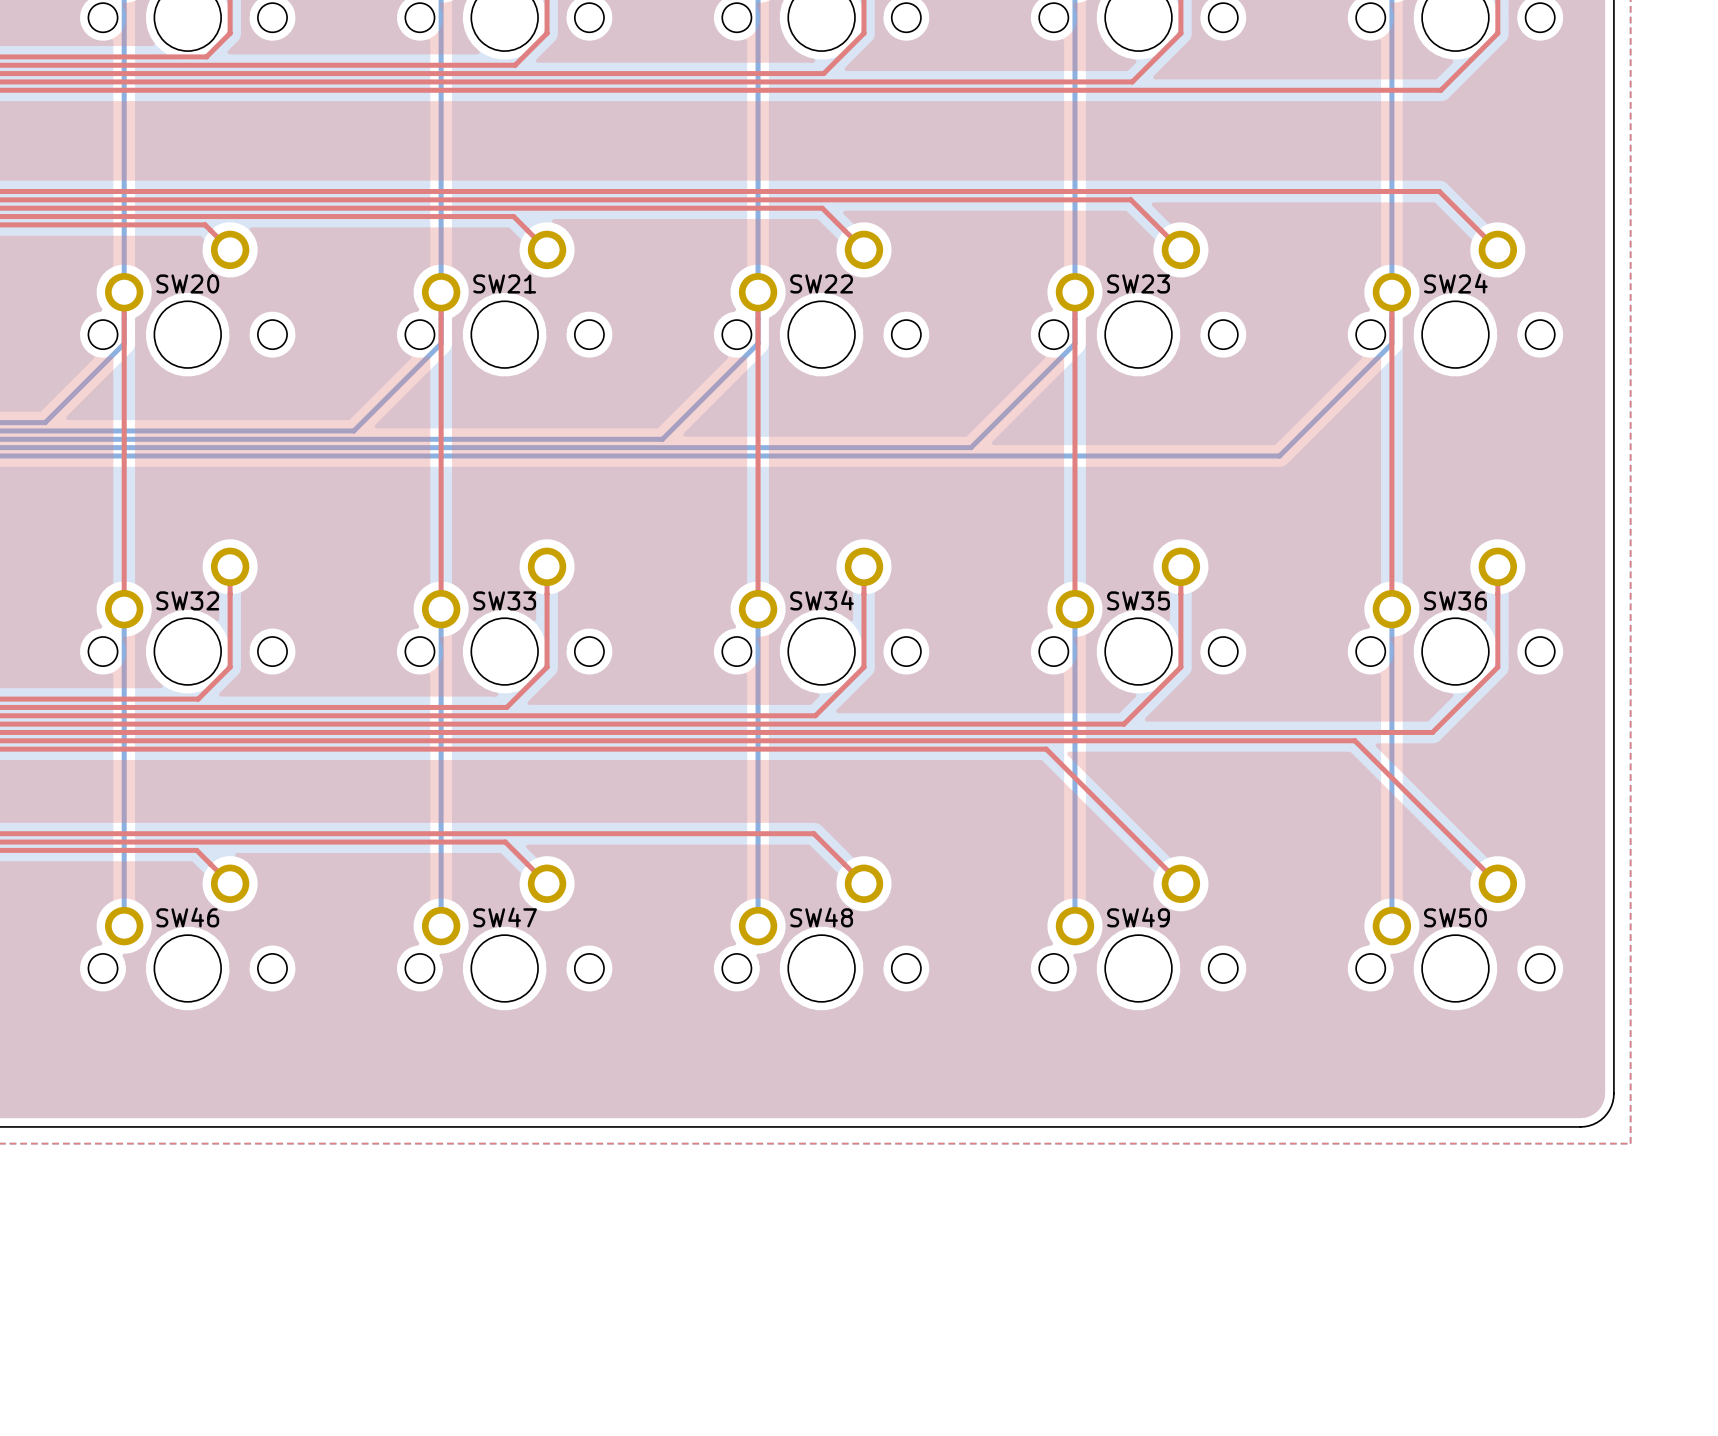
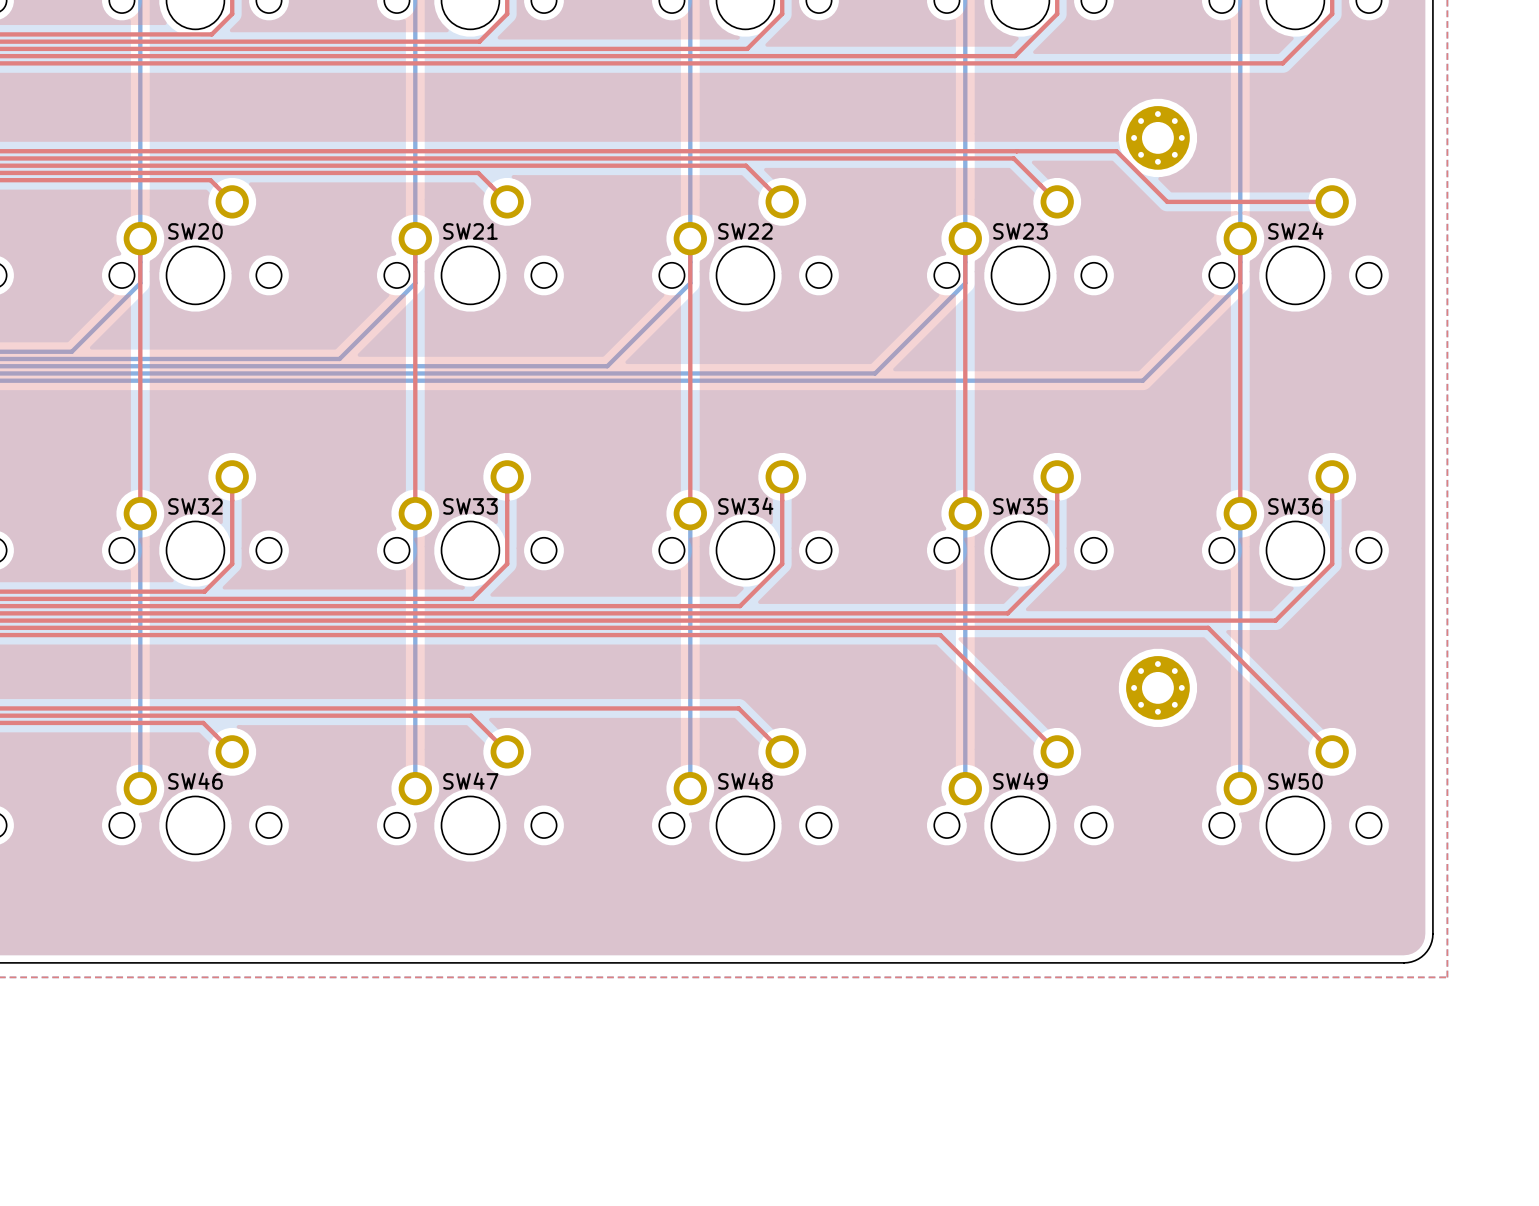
part: none -> (1157, 137)
top track: (1249, 191) (1439, 191) (1497, 249) -> (1116, 151) (1167, 201) (1332, 201)
part: none -> (1157, 687)

